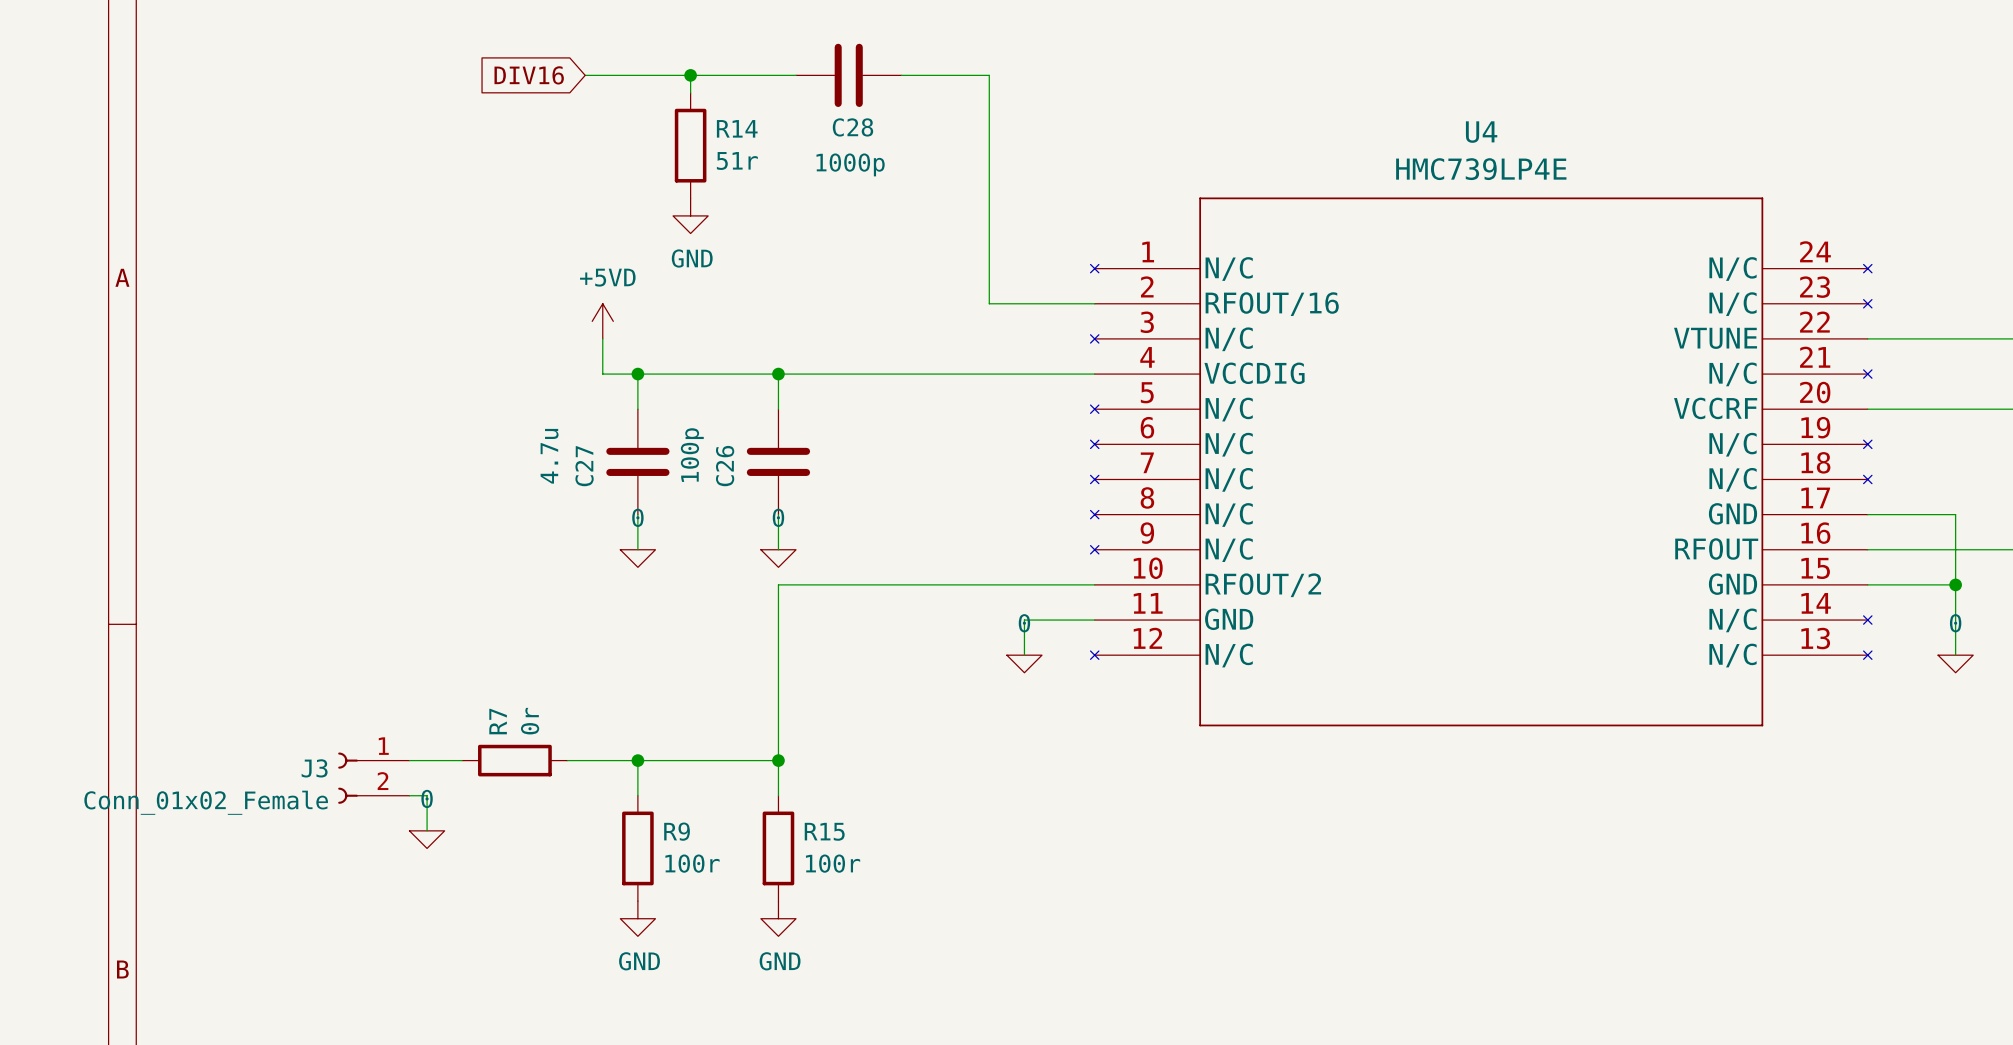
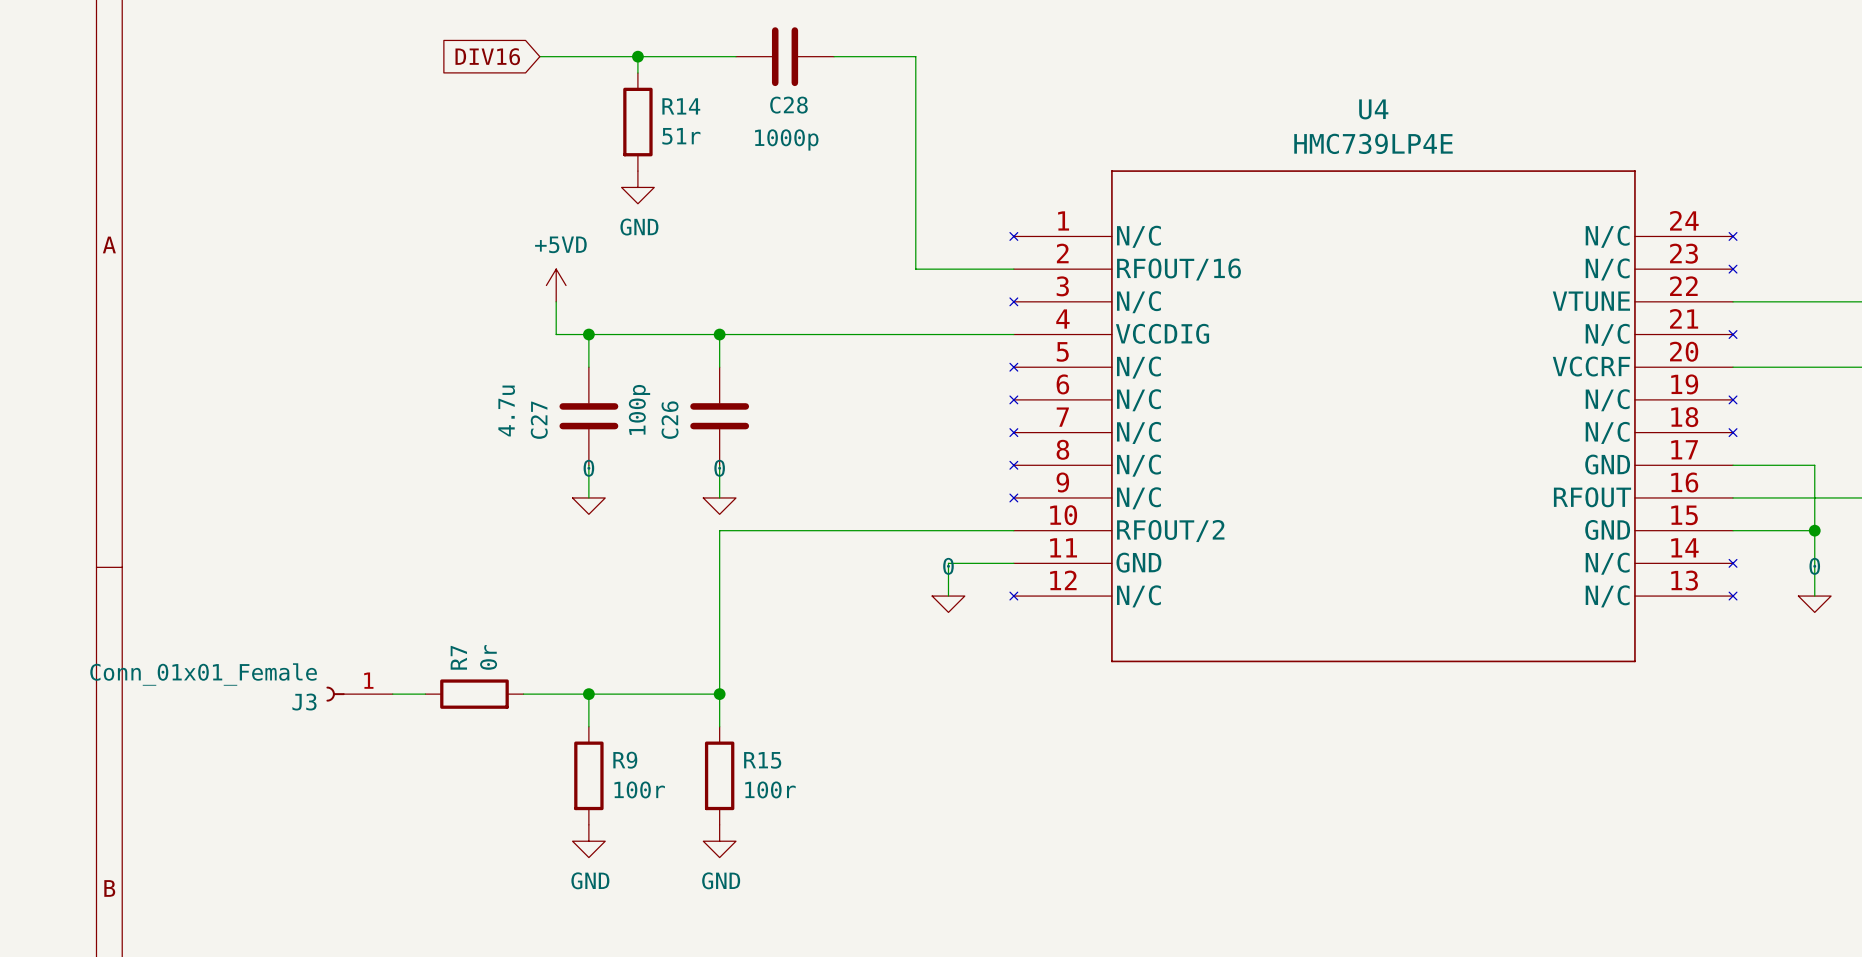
J3 symbol: [338, 752, 410, 804] -> [326, 686, 393, 702]
wire: (409, 795) (427, 795) (427, 830) -> none
J3 value: Conn_01x02_Female (206, 802) -> Conn_01x01_Female (203, 674)
power symbol: 0 (427, 839) -> none

